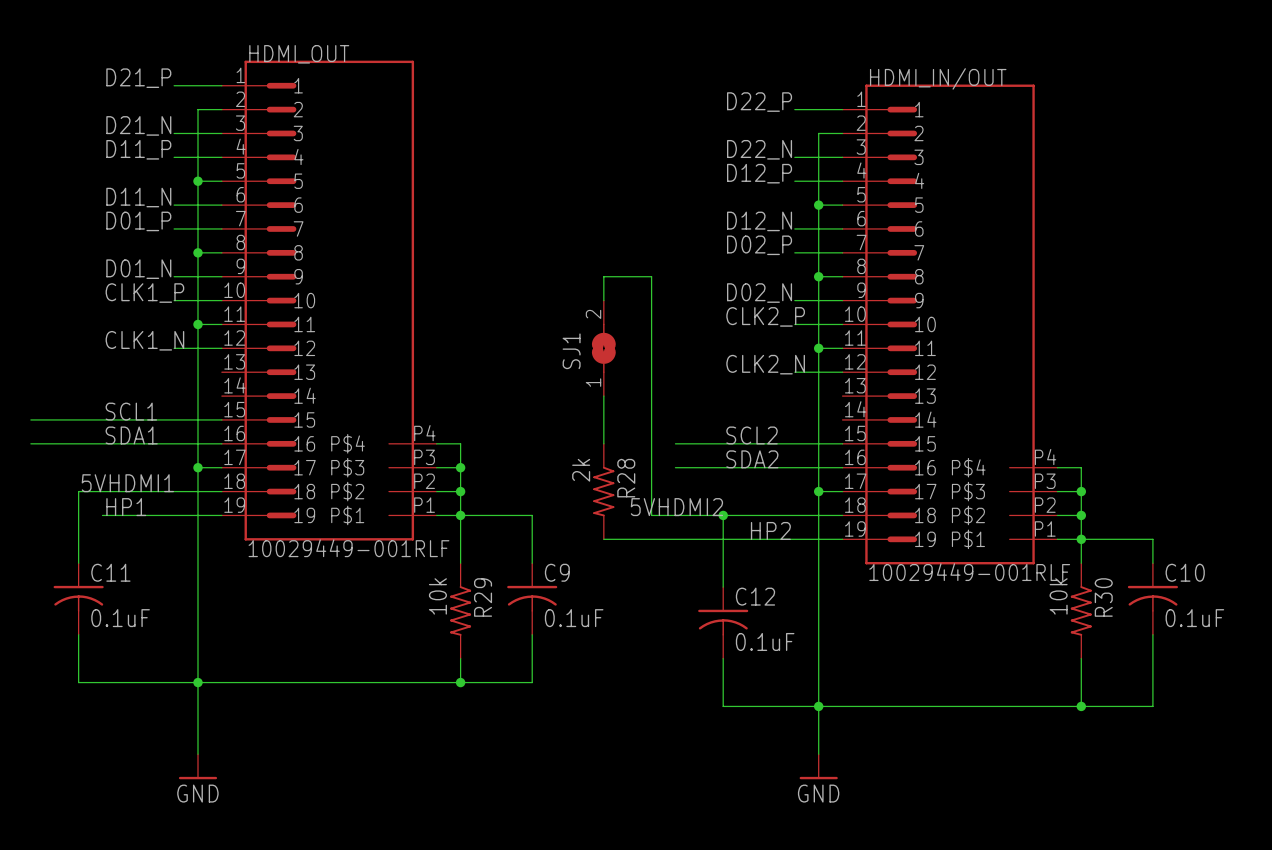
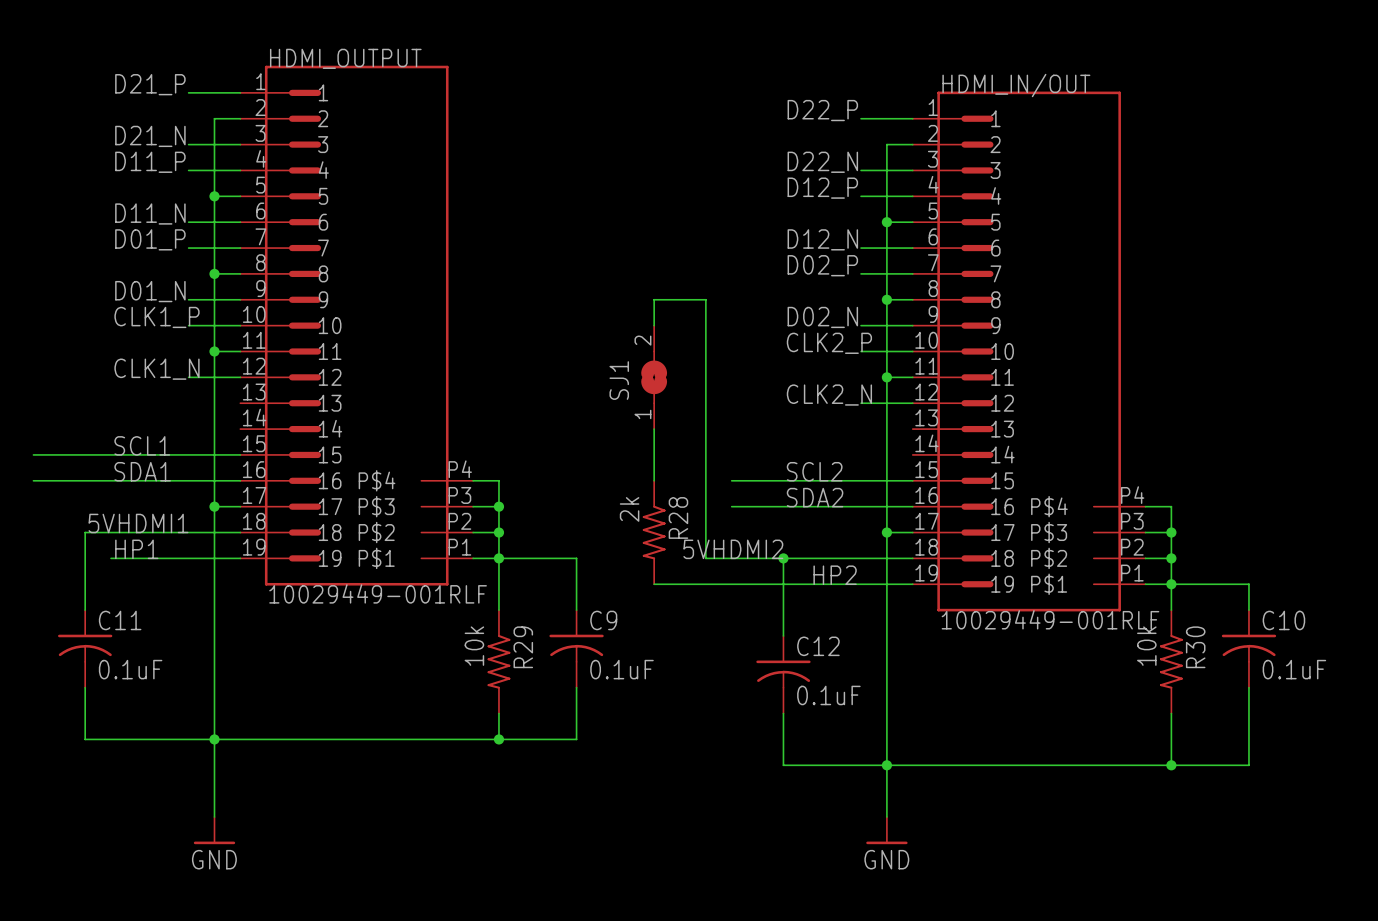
HDMI_OUT name: HDMI_OUT (299, 54) -> HDMI_OUTPUT (345, 58)

